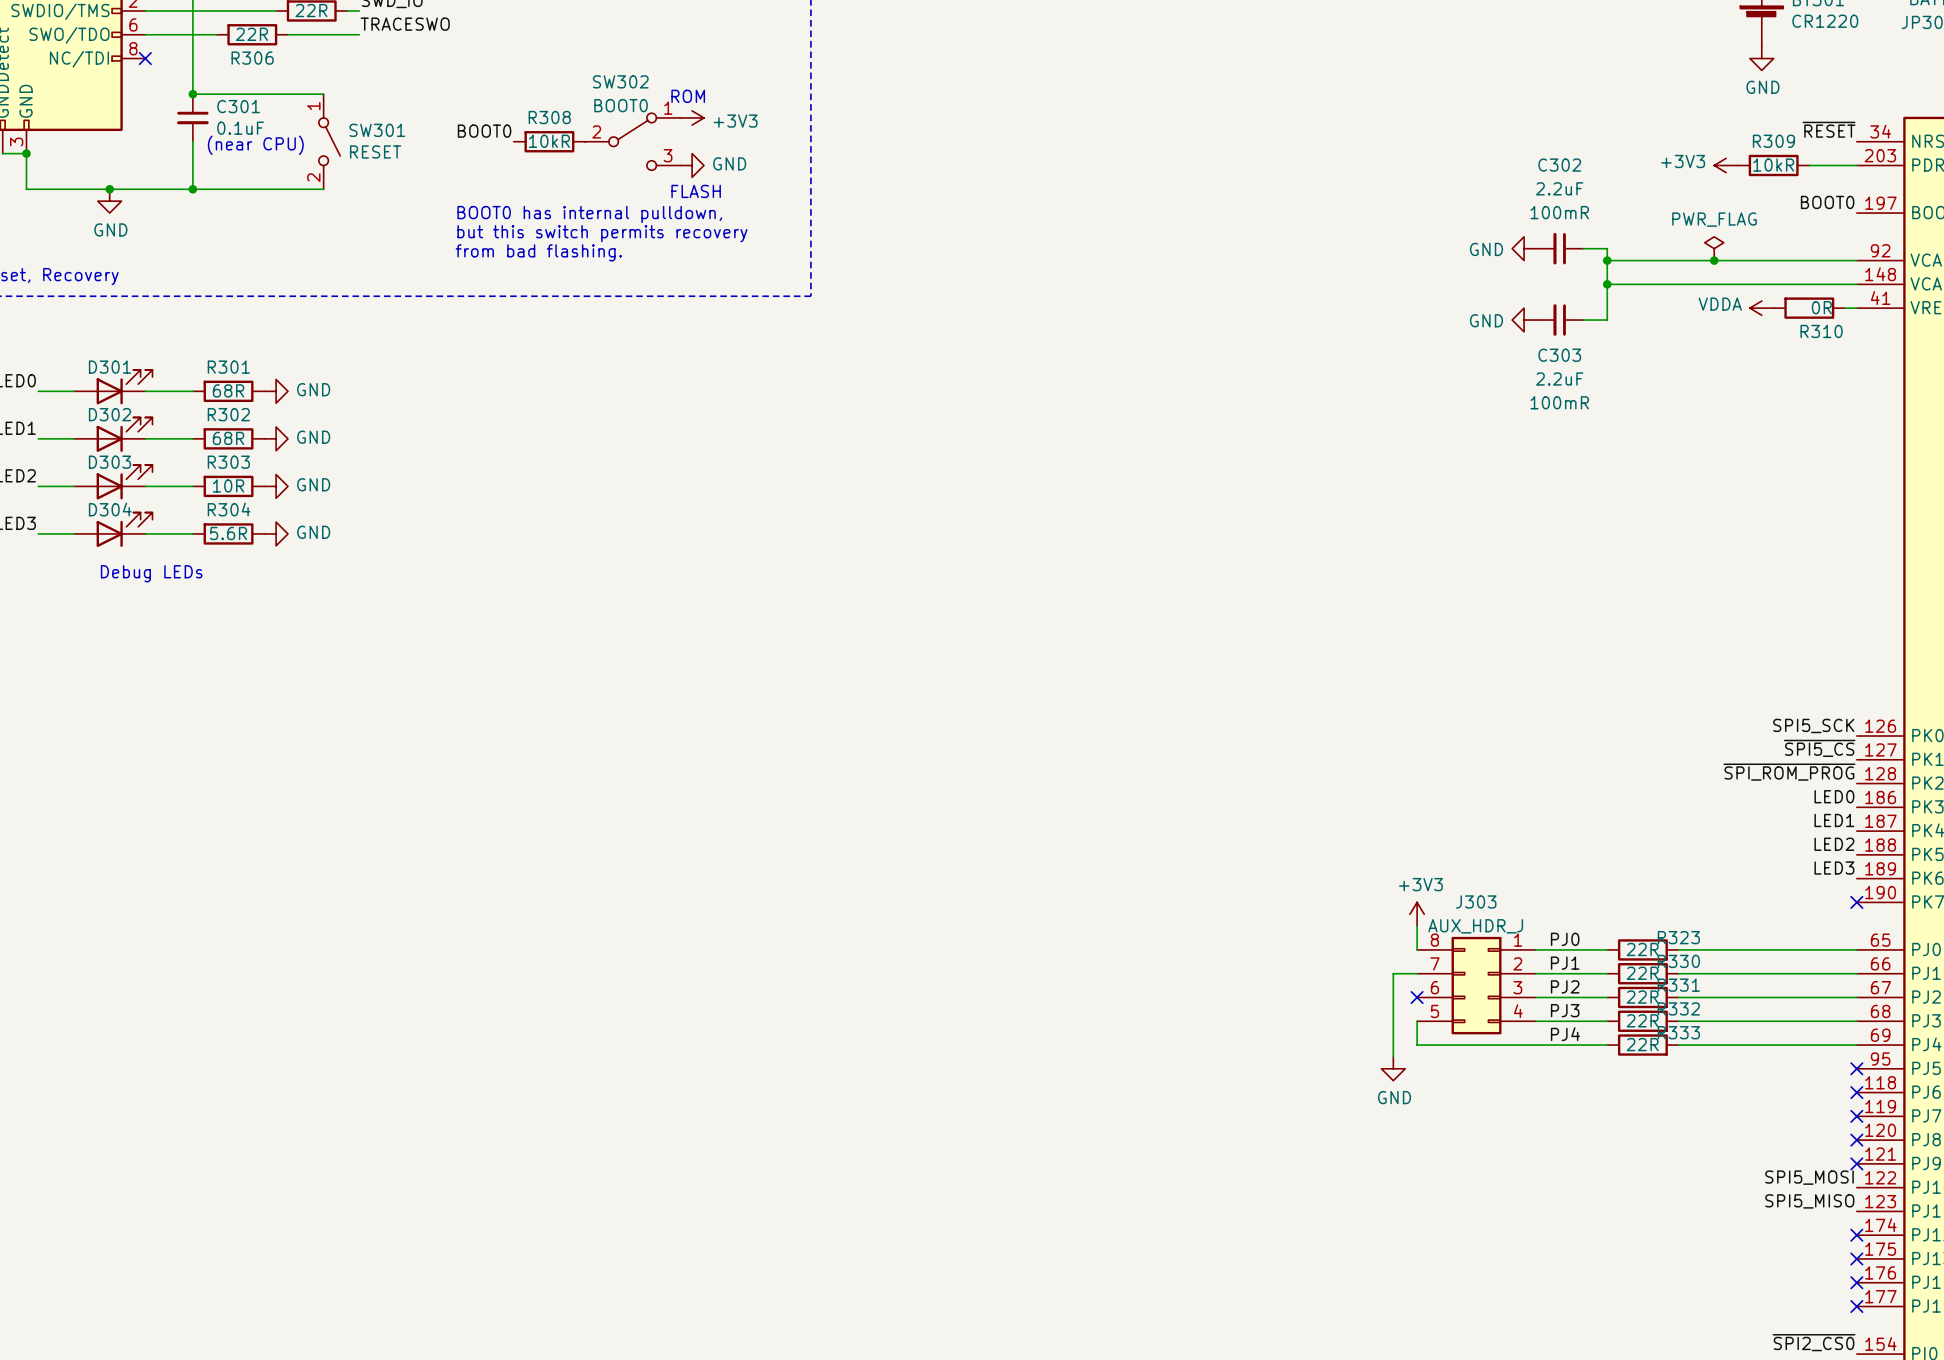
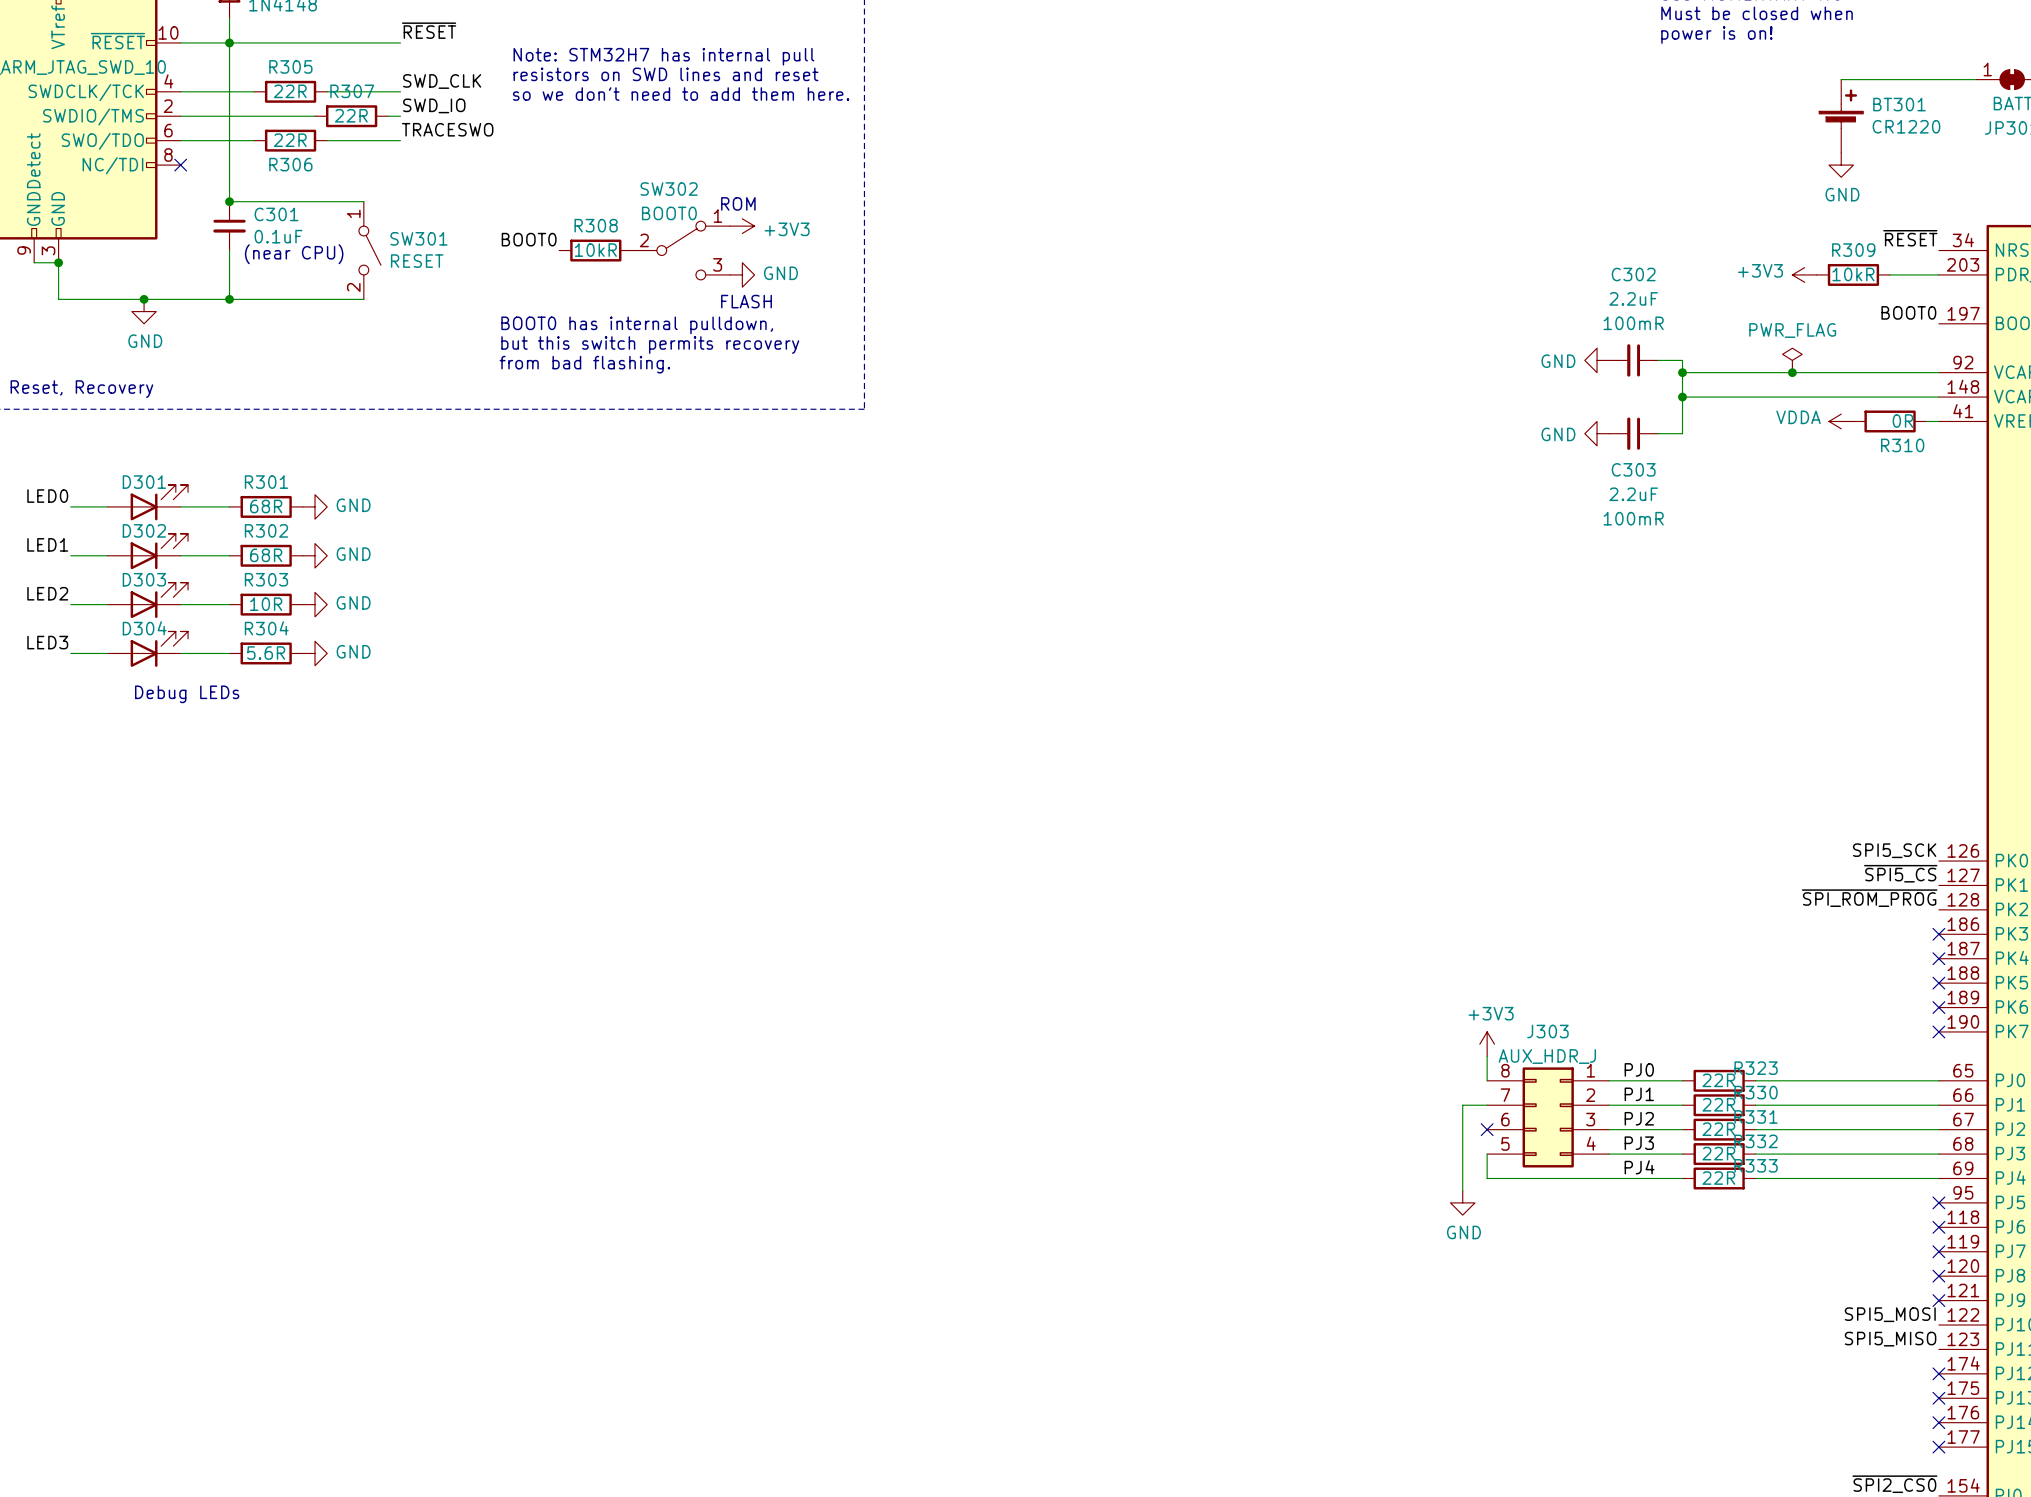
label: LED0 (1834, 796) -> none
no-connect mark: none -> (1938, 934)
label: LED1 (1834, 820) -> none
no-connect mark: none -> (1938, 958)
label: LED2 (1834, 844) -> none
no-connect mark: none -> (1938, 983)
label: LED3 (1834, 868) -> none
no-connect mark: none -> (1938, 1007)

